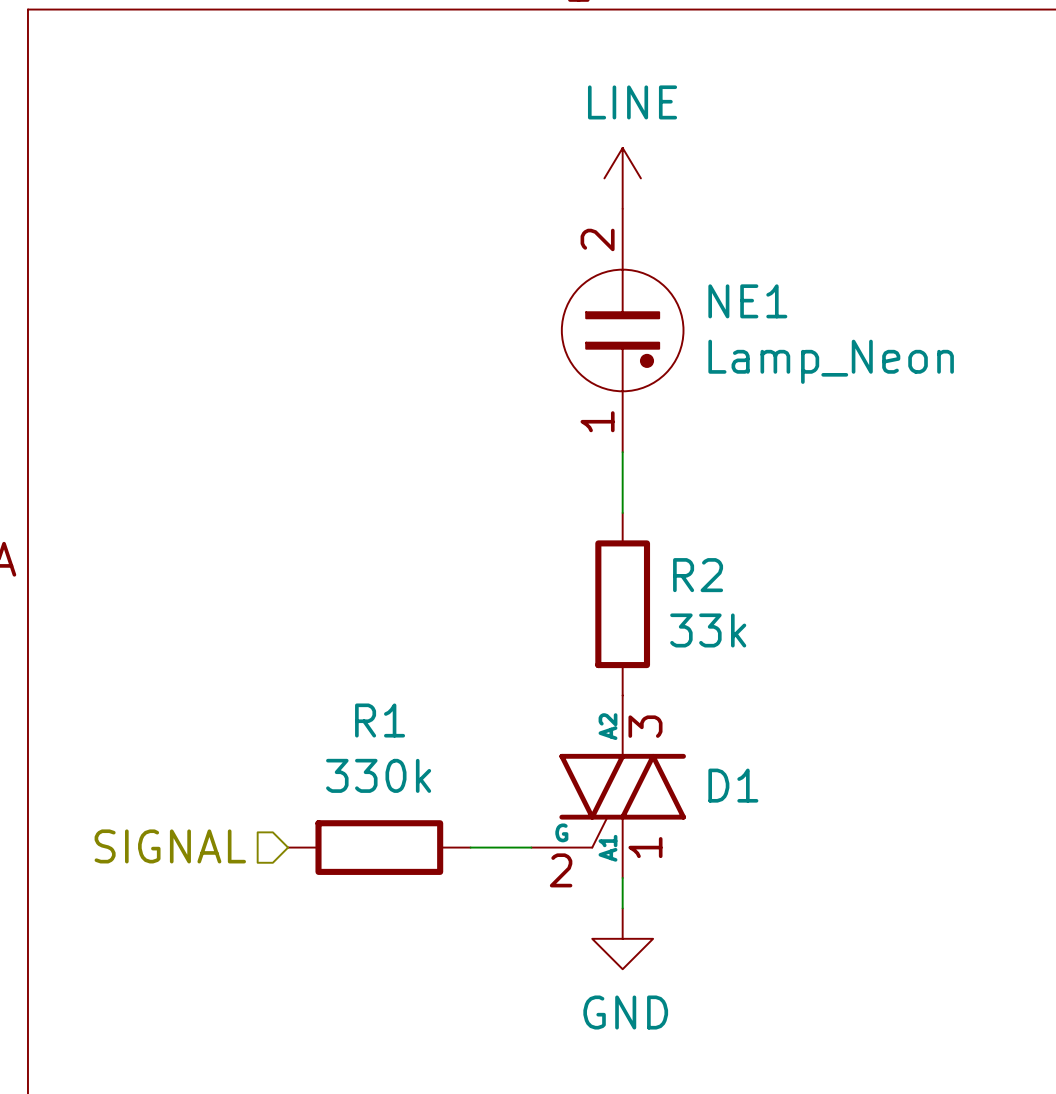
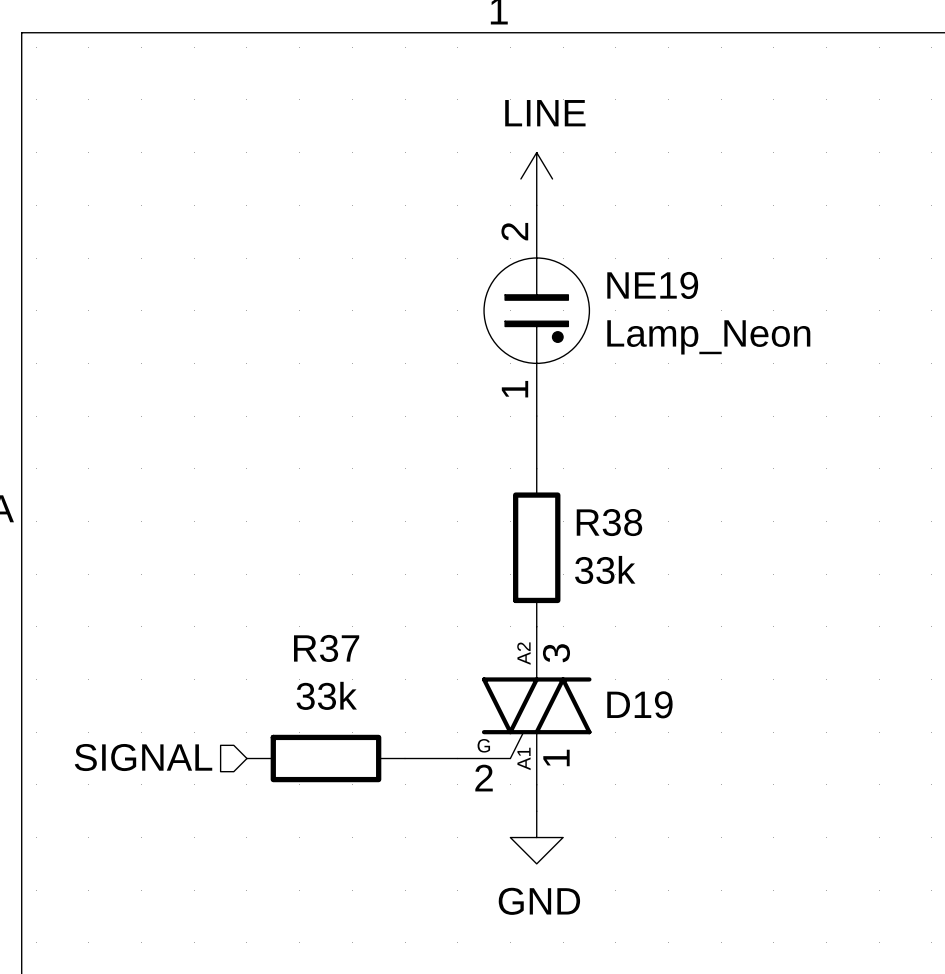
NE1 name: NE1 (747, 301) -> NE19 (652, 285)
R2 name: R2 (698, 575) -> R38 (609, 522)
R1 name: R1 (380, 720) -> R37 (326, 648)
R1 value: 330k (378, 775) -> 33k (326, 695)
D1 name: D1 (733, 785) -> D19 (639, 704)

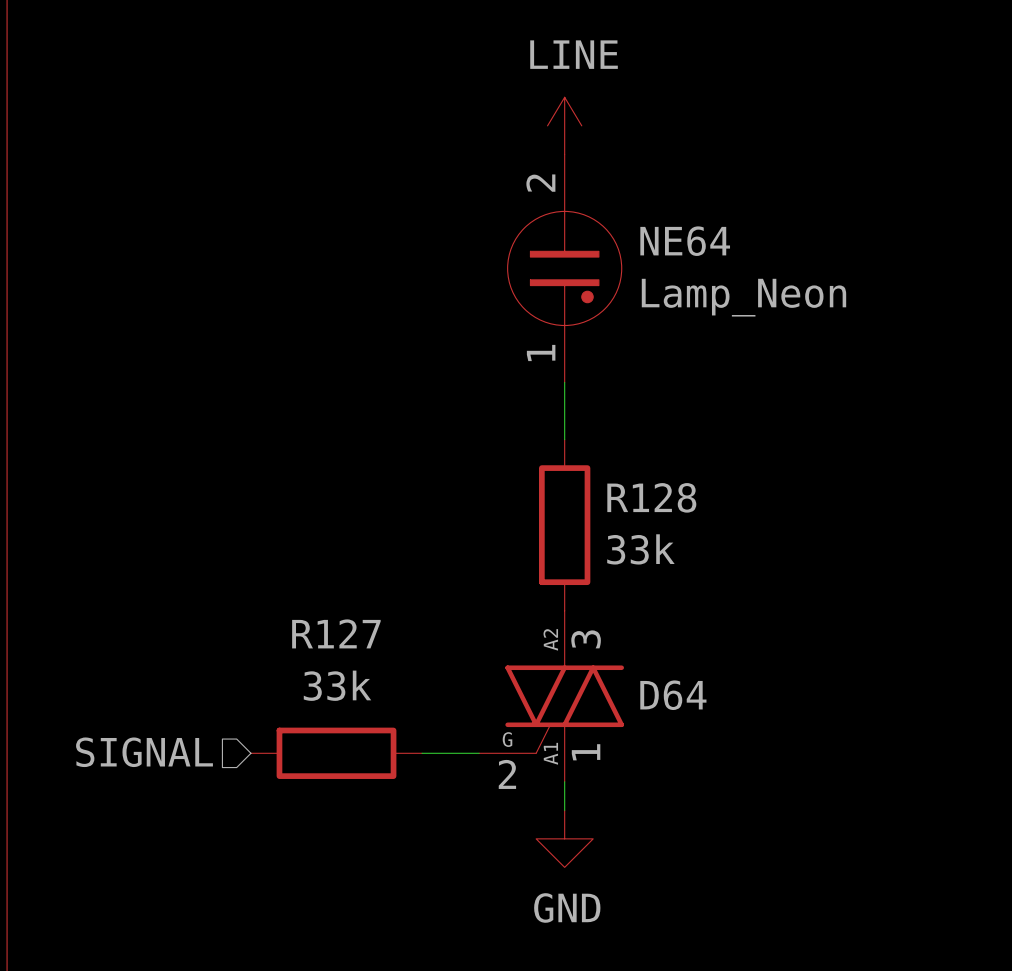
NE19 name: NE19 (652, 285) -> NE64 (685, 241)
R38 name: R38 (609, 522) -> R128 (651, 497)
R37 name: R37 (326, 648) -> R127 (336, 633)
D19 name: D19 (639, 704) -> D64 (673, 695)

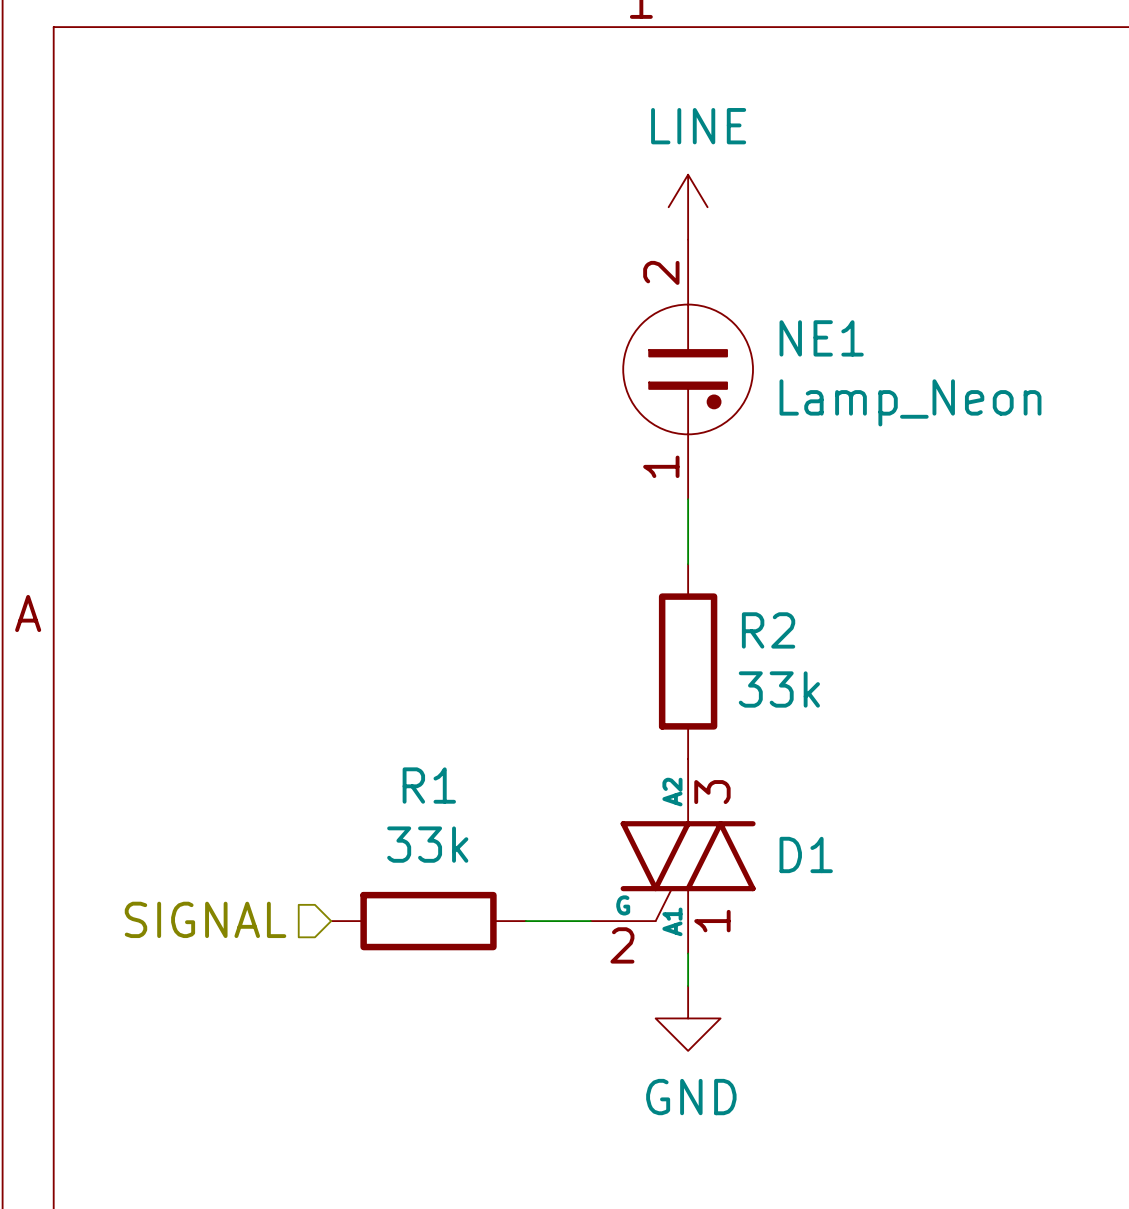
NE64 name: NE64 (685, 241) -> NE1 (821, 338)
R128 name: R128 (651, 497) -> R2 (768, 630)
R127 name: R127 (336, 633) -> R1 (429, 785)
D64 name: D64 (673, 695) -> D1 (806, 854)

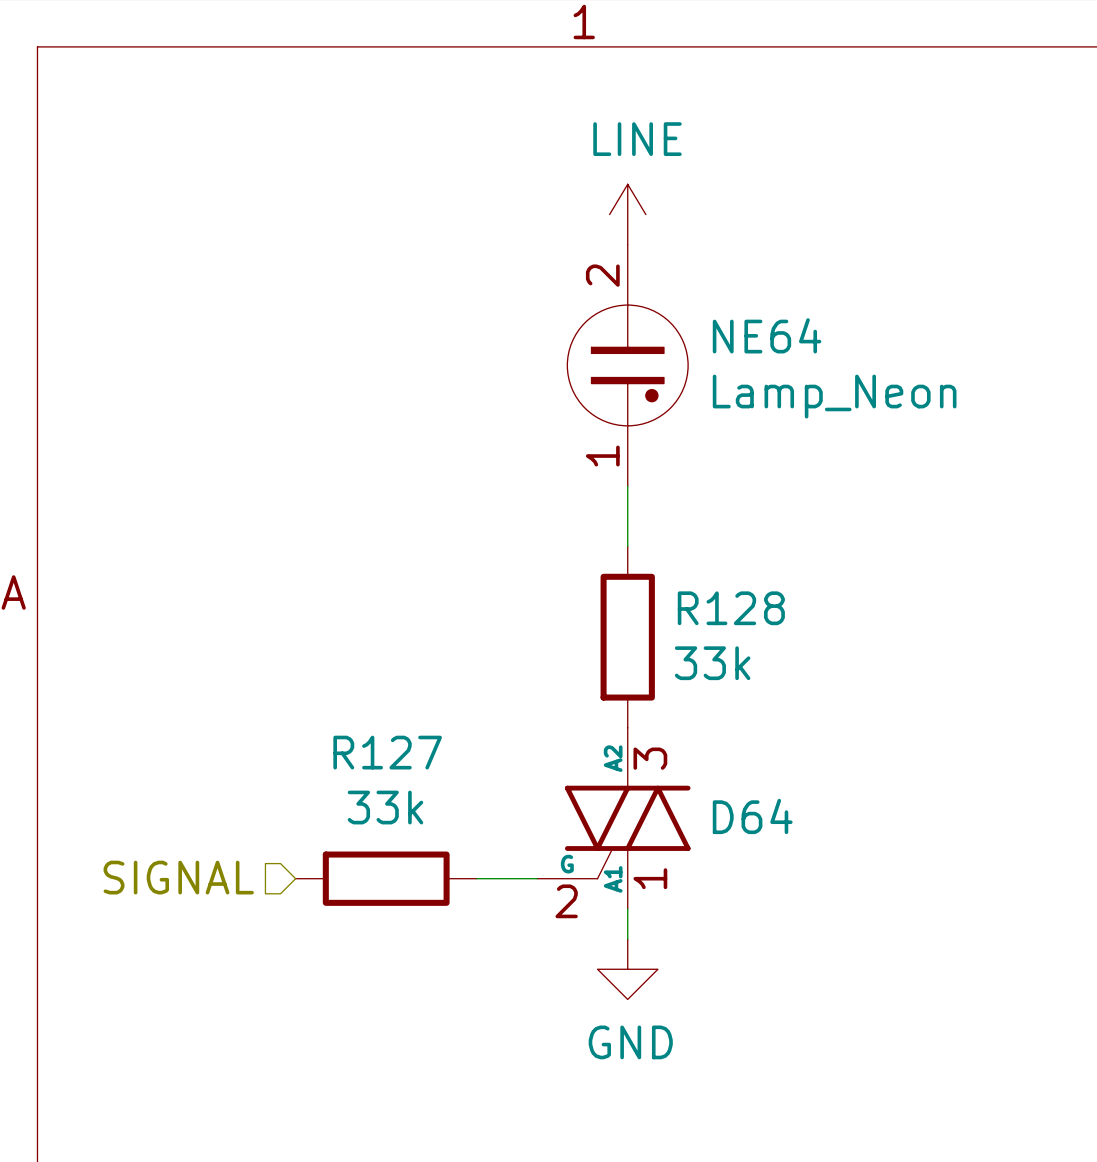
NE1 name: NE1 (821, 338) -> NE64 (767, 335)
R2 name: R2 (768, 630) -> R128 (731, 608)
R1 name: R1 (429, 785) -> R127 (387, 752)
D1 name: D1 (806, 854) -> D64 (752, 816)

